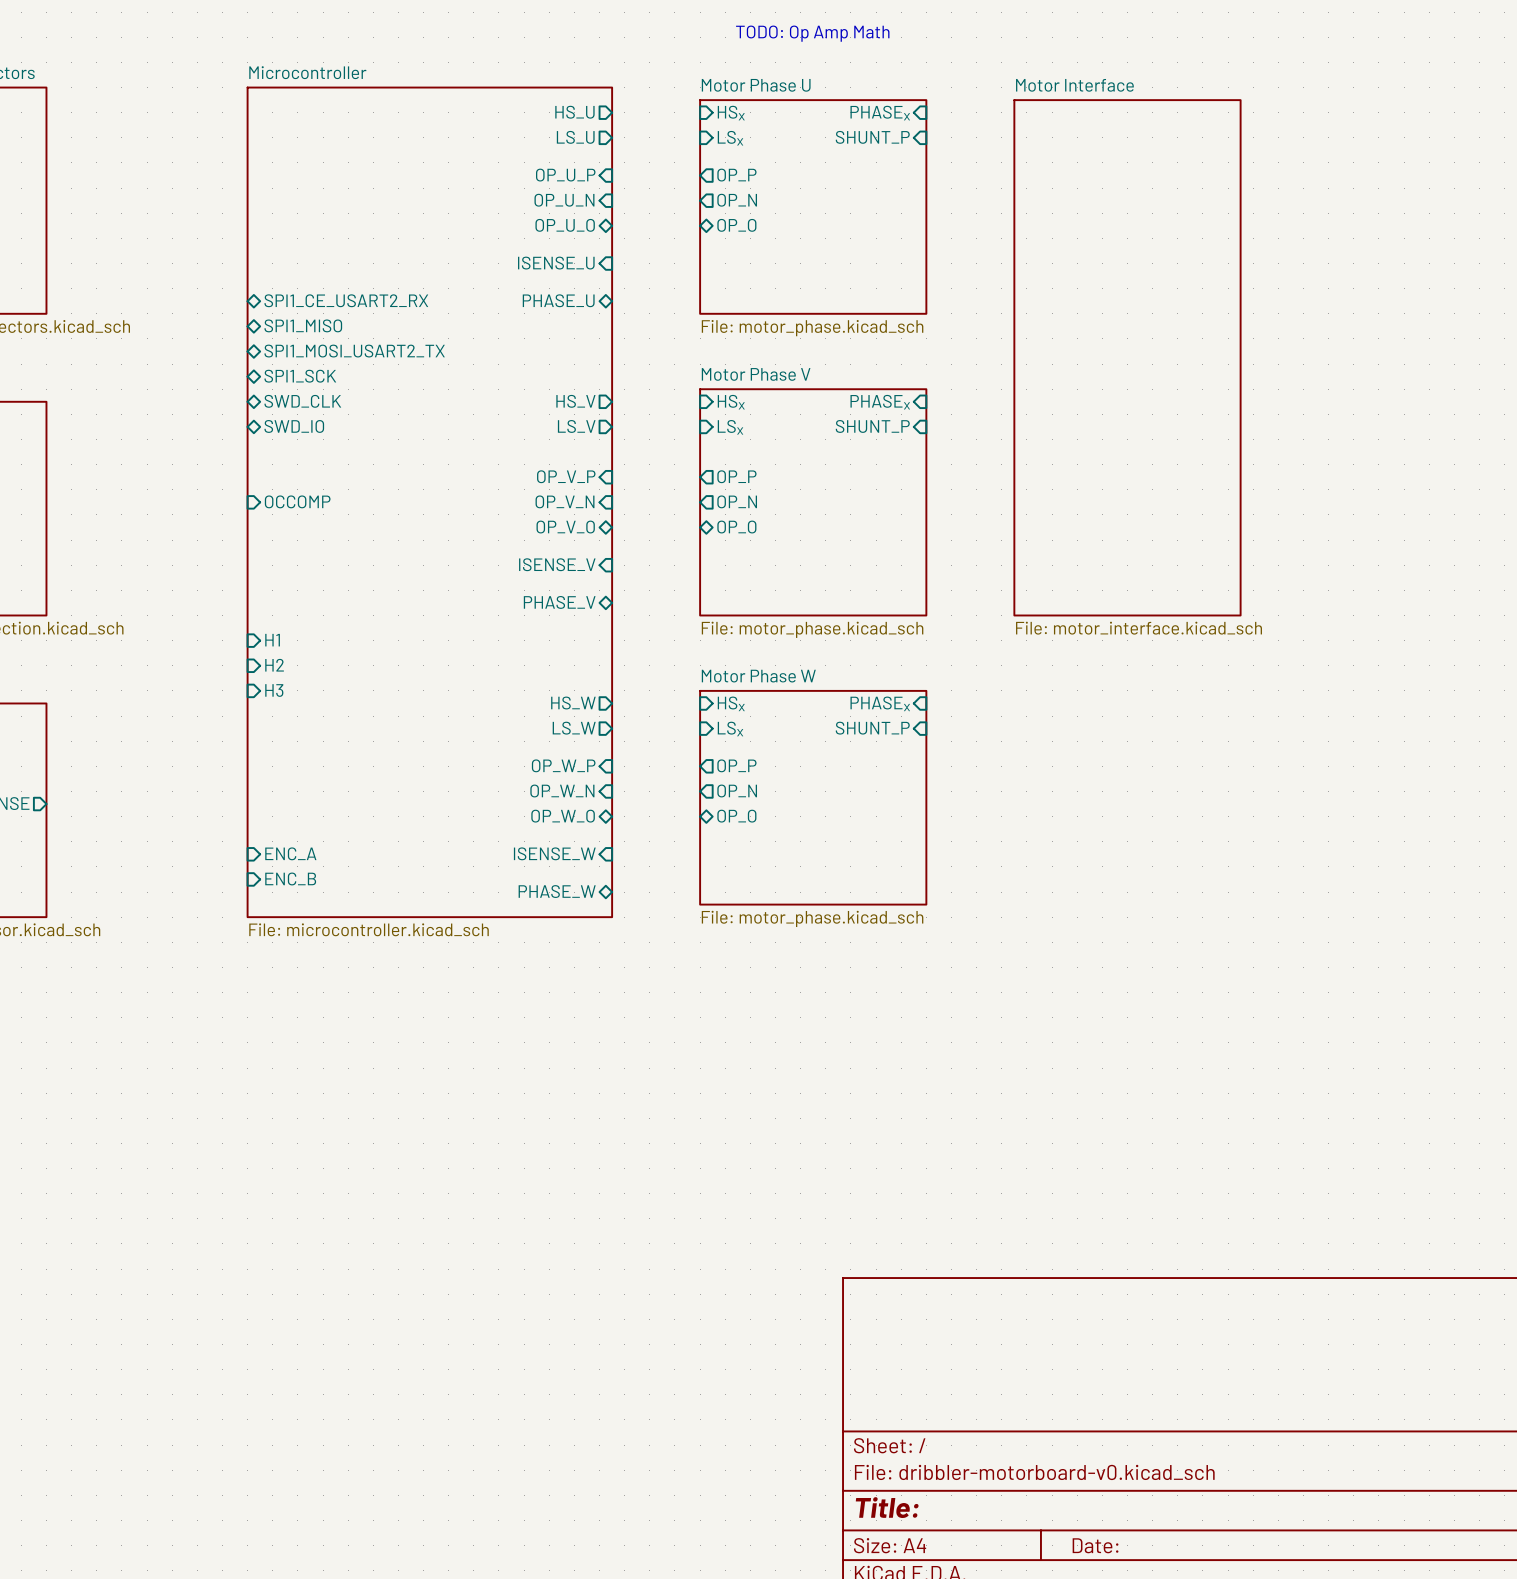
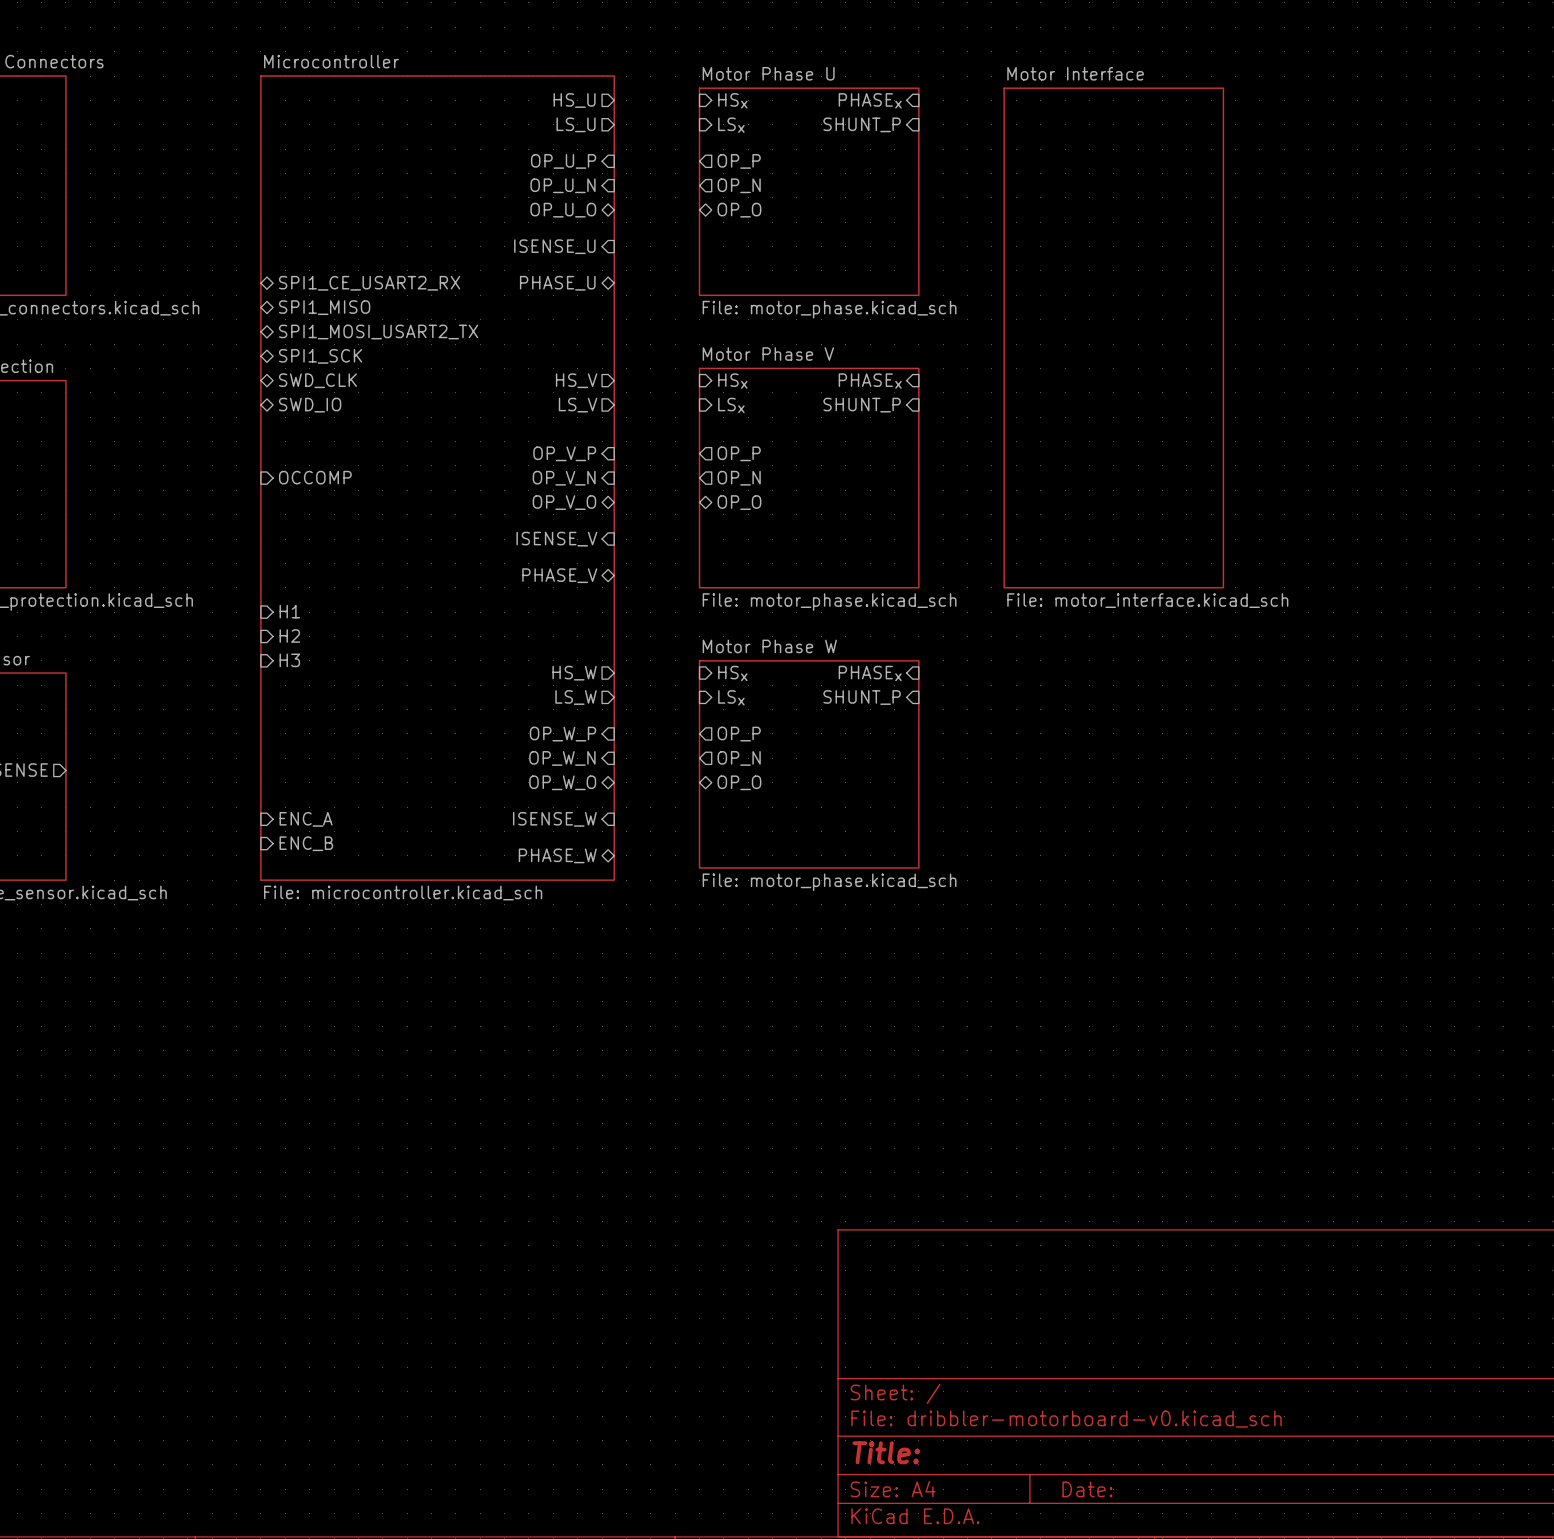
text: TODO: Op Amp Math (812, 33) -> none

